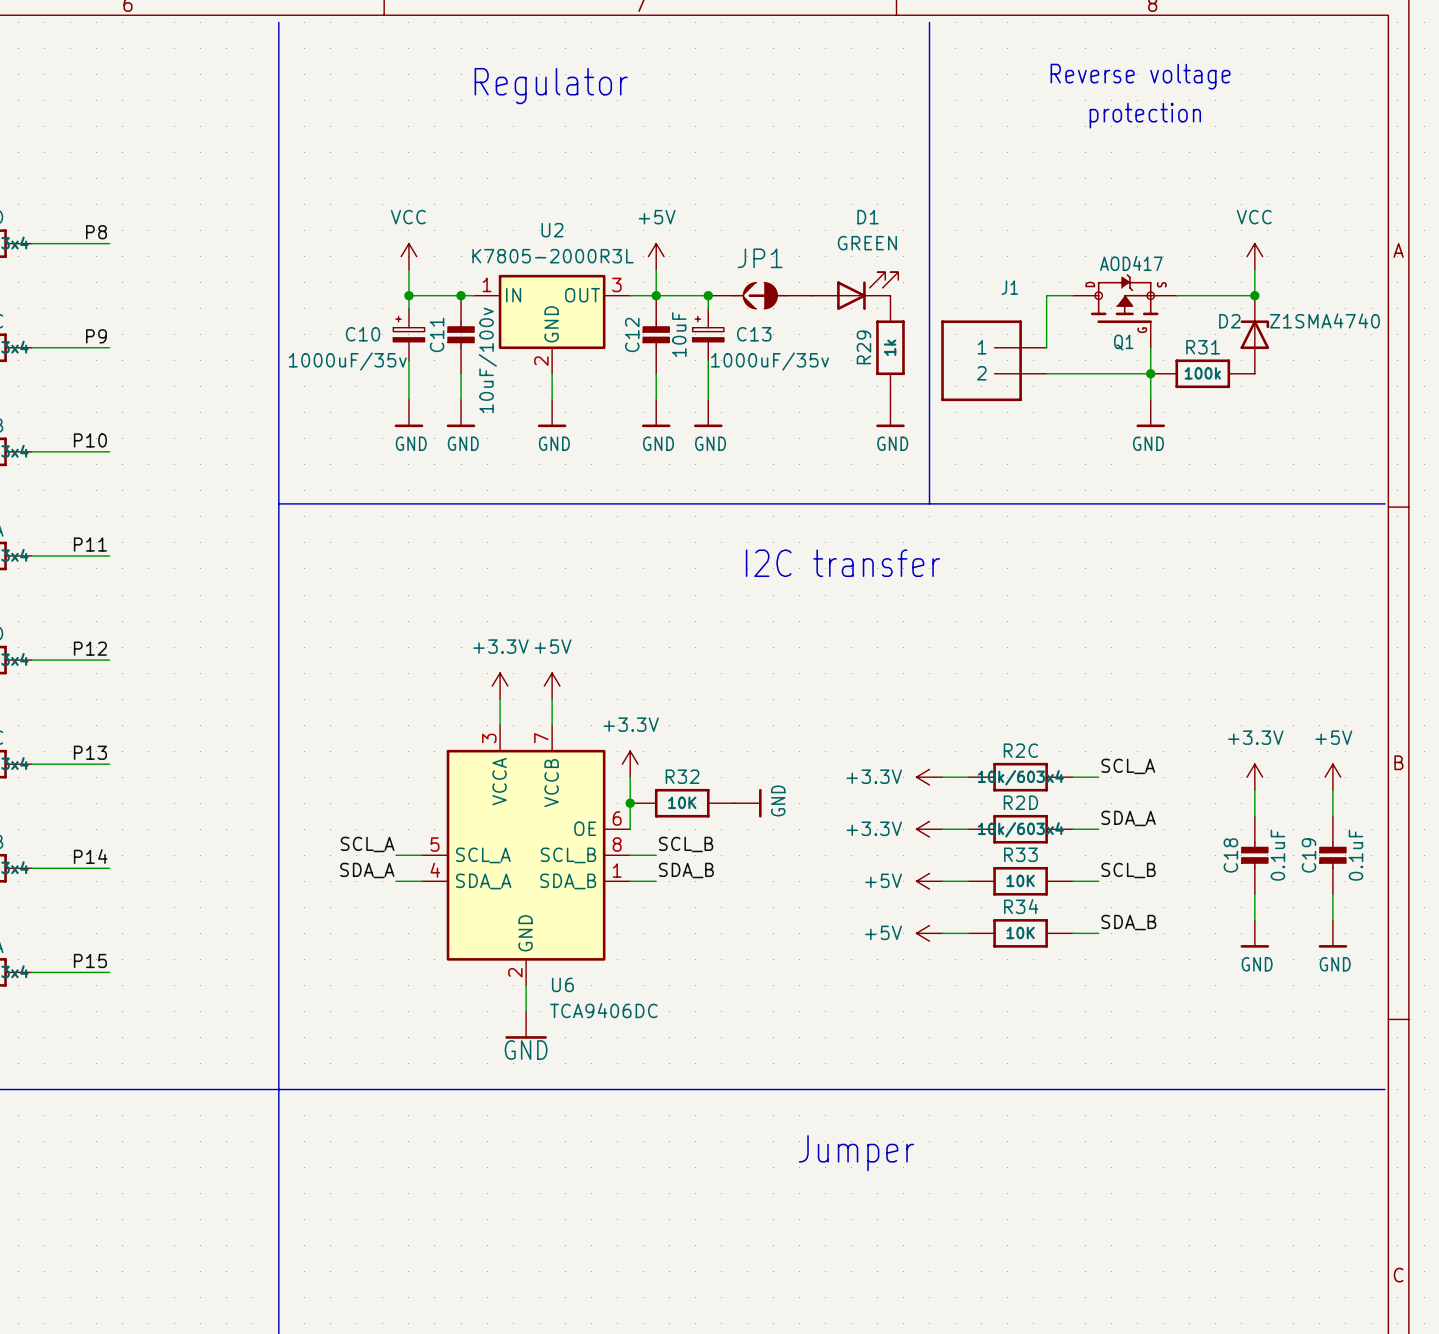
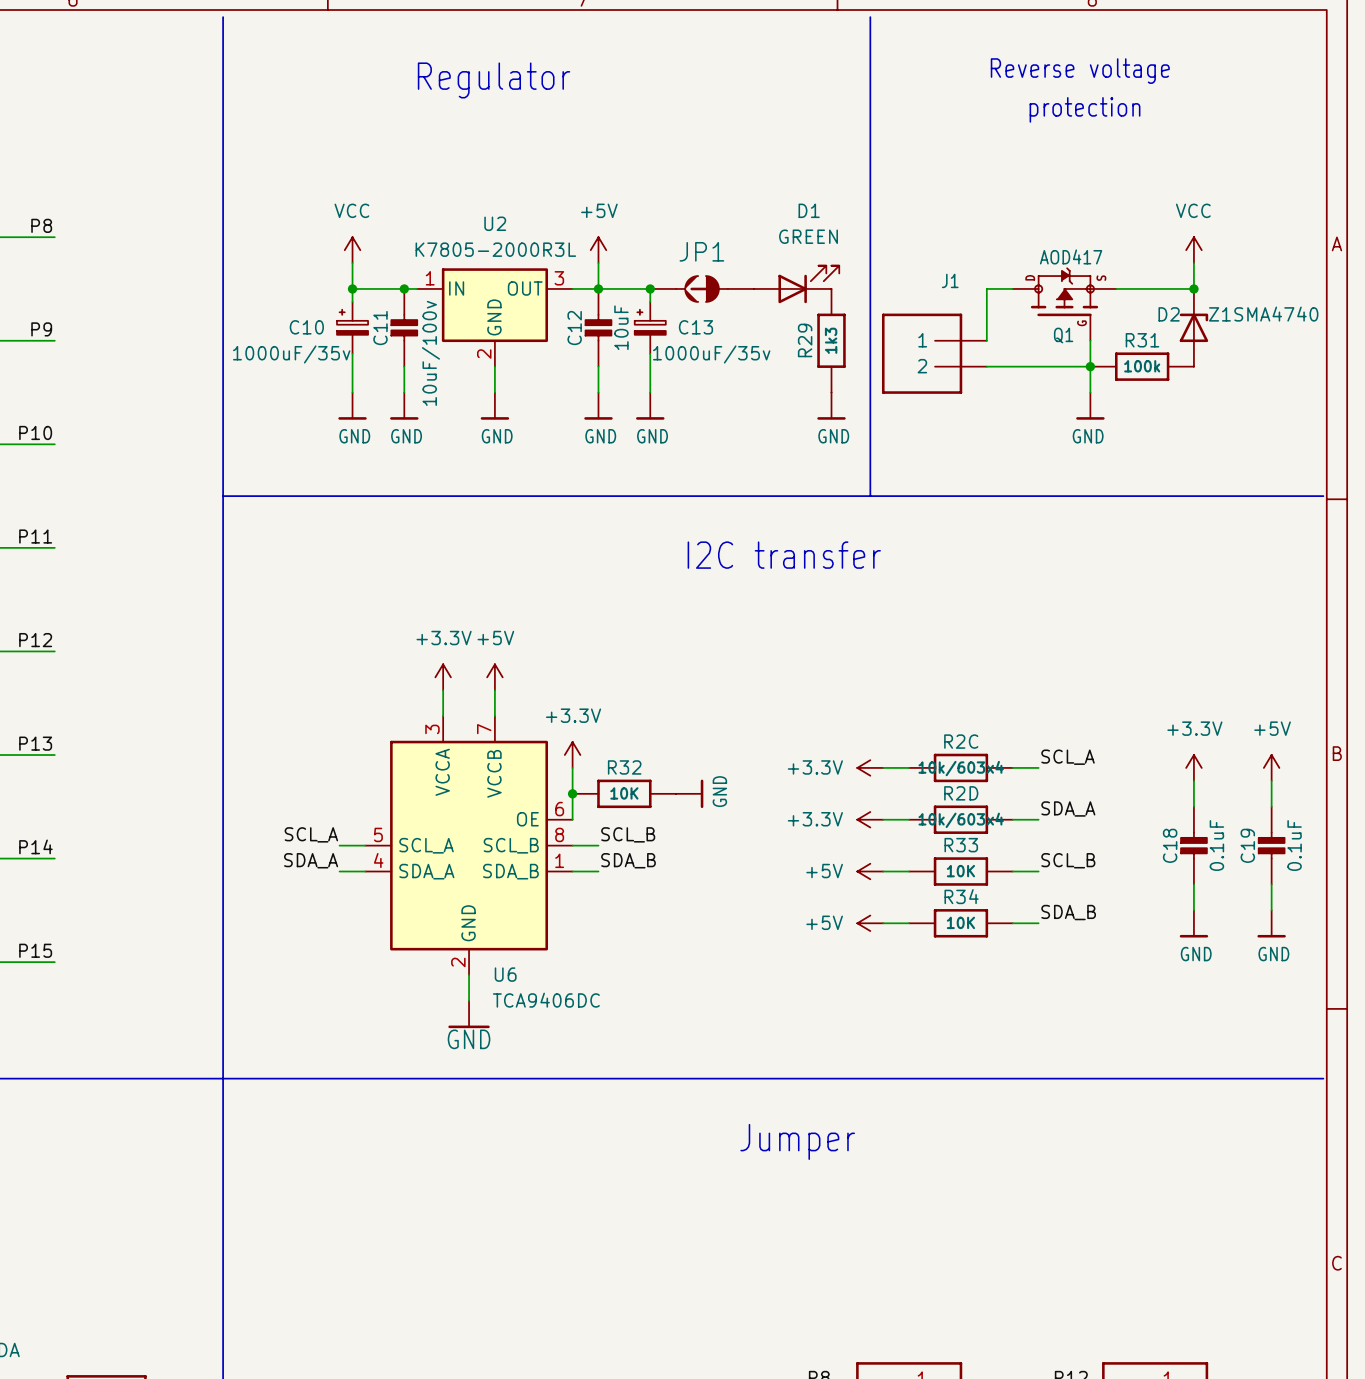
R29 value: 1k (890, 347) -> 1k3 (831, 340)

